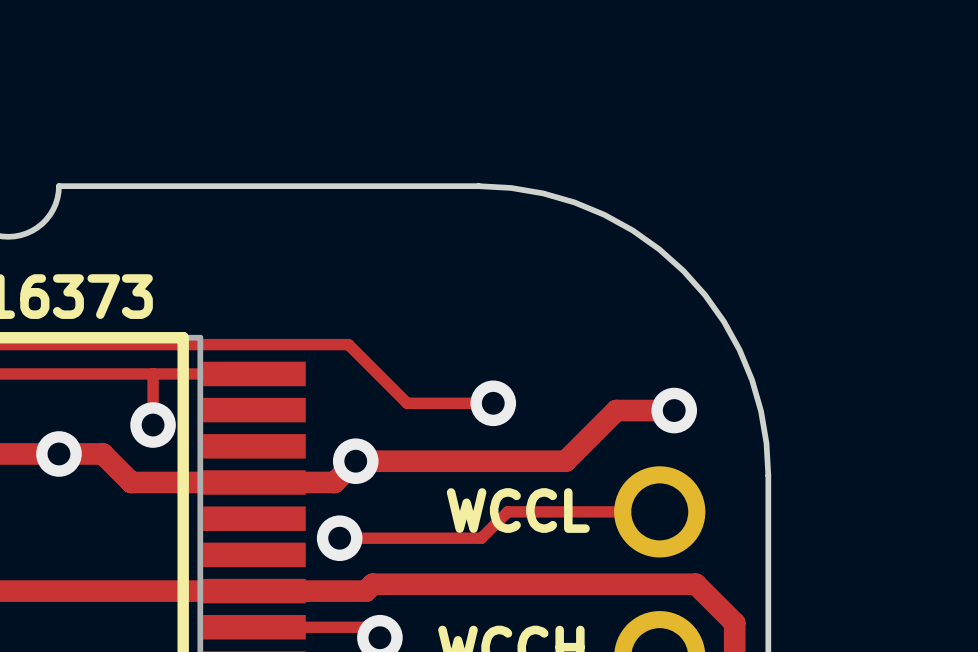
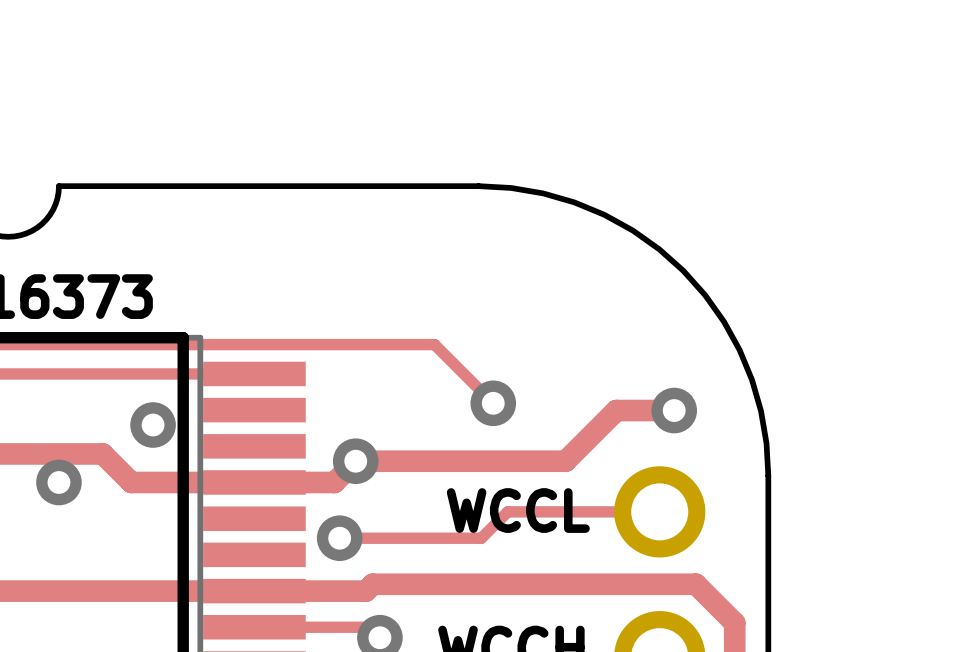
track: (348, 344) (407, 403) (493, 403) -> (348, 344) (434, 344) (493, 403)
track: (153, 373) (153, 425) -> none
via position: (58, 453) -> (58, 482)

